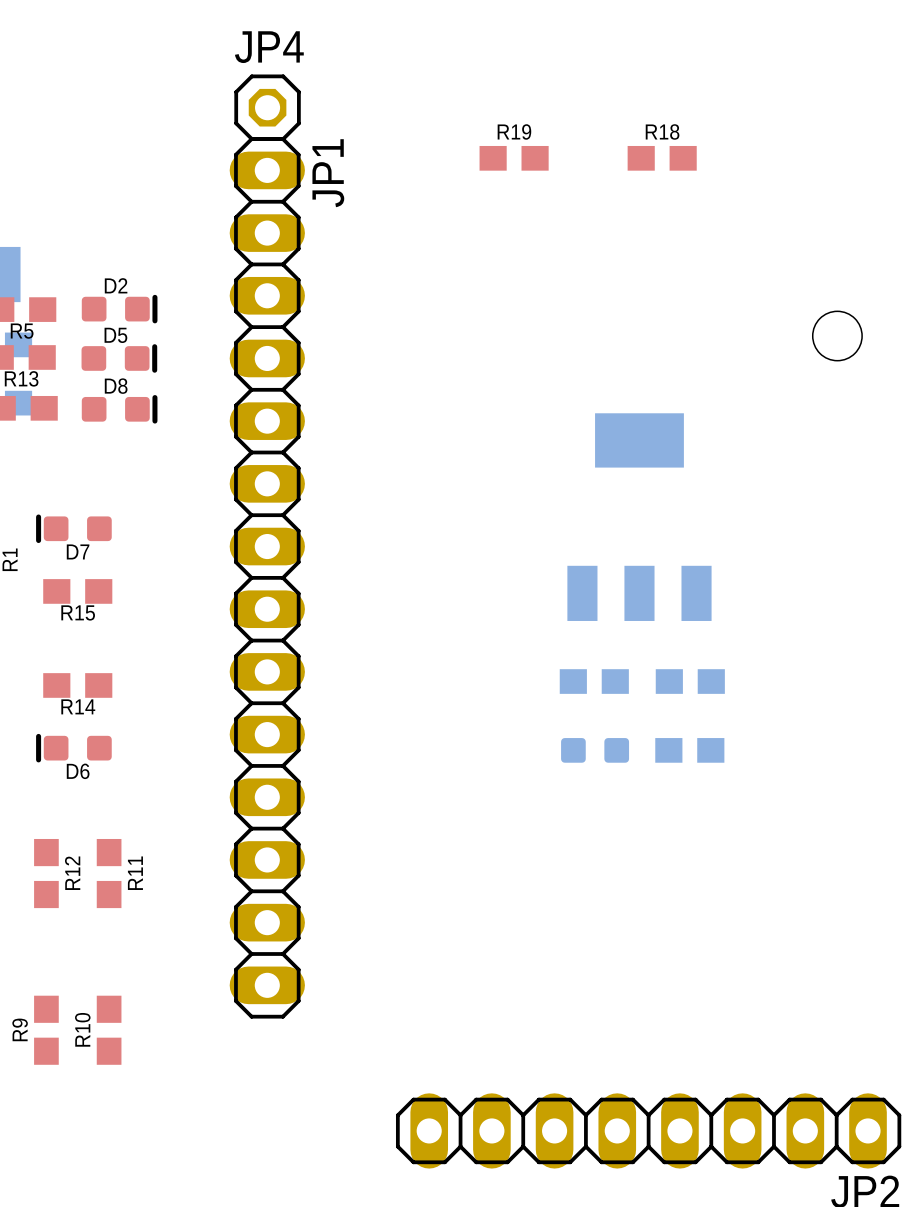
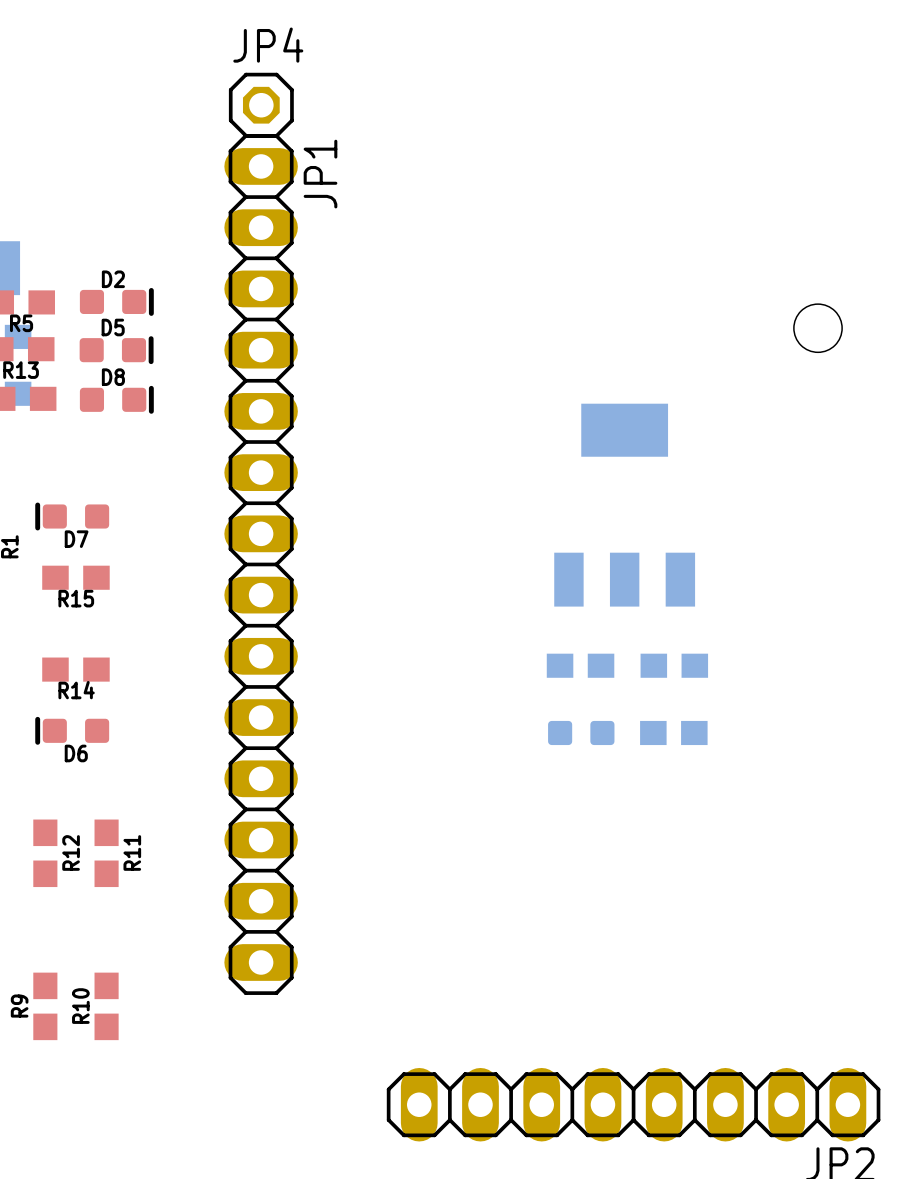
R19: (514, 158) -> none
R18: (662, 158) -> none

